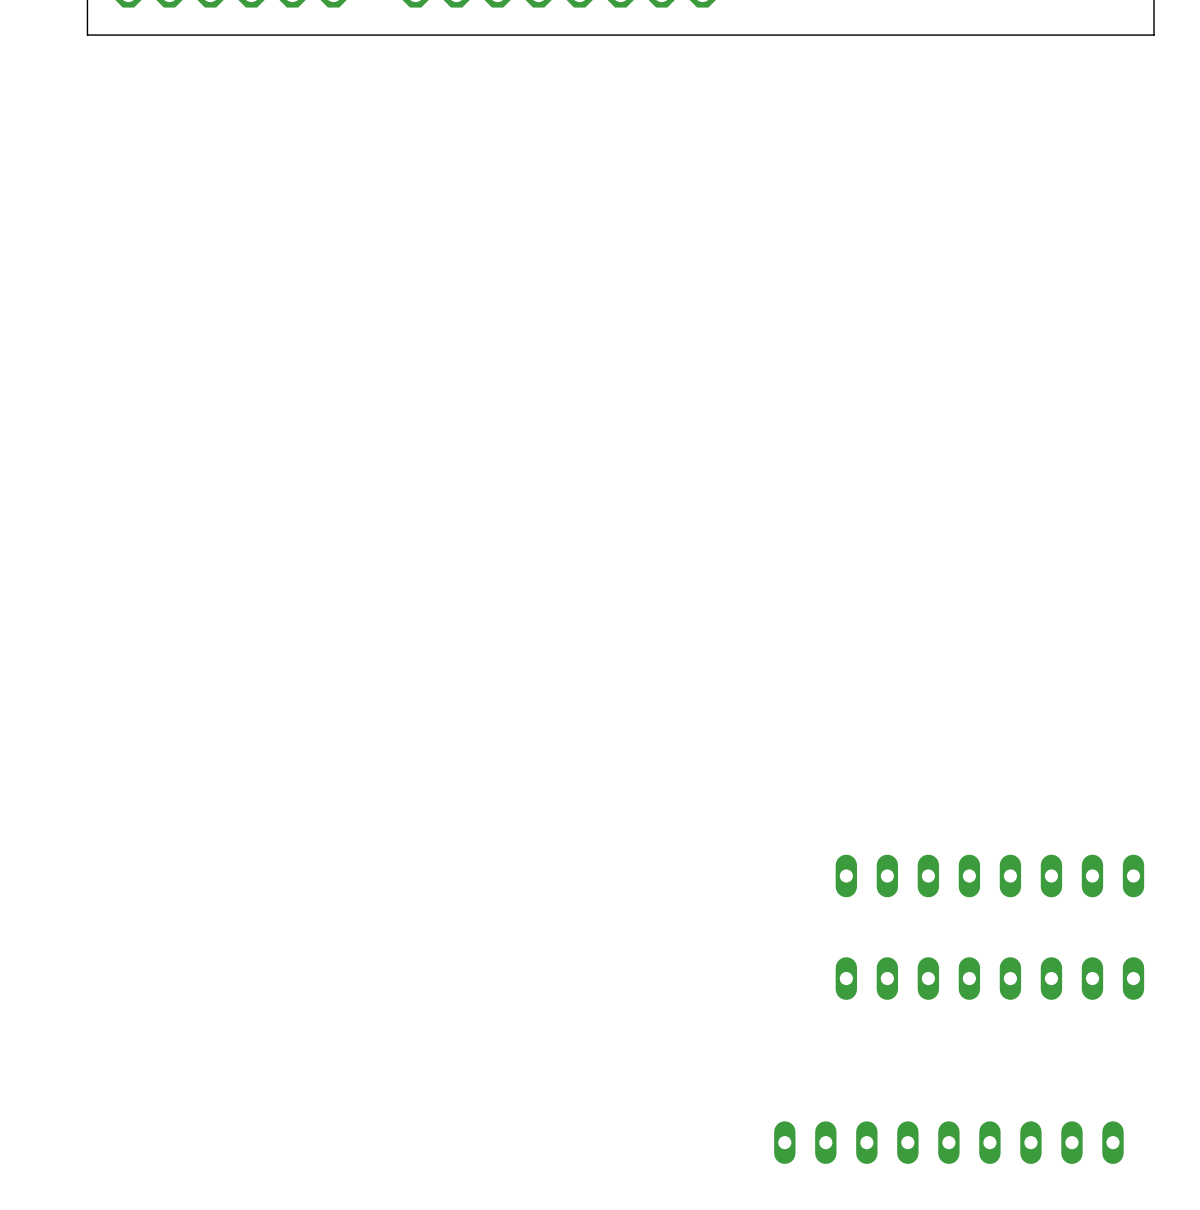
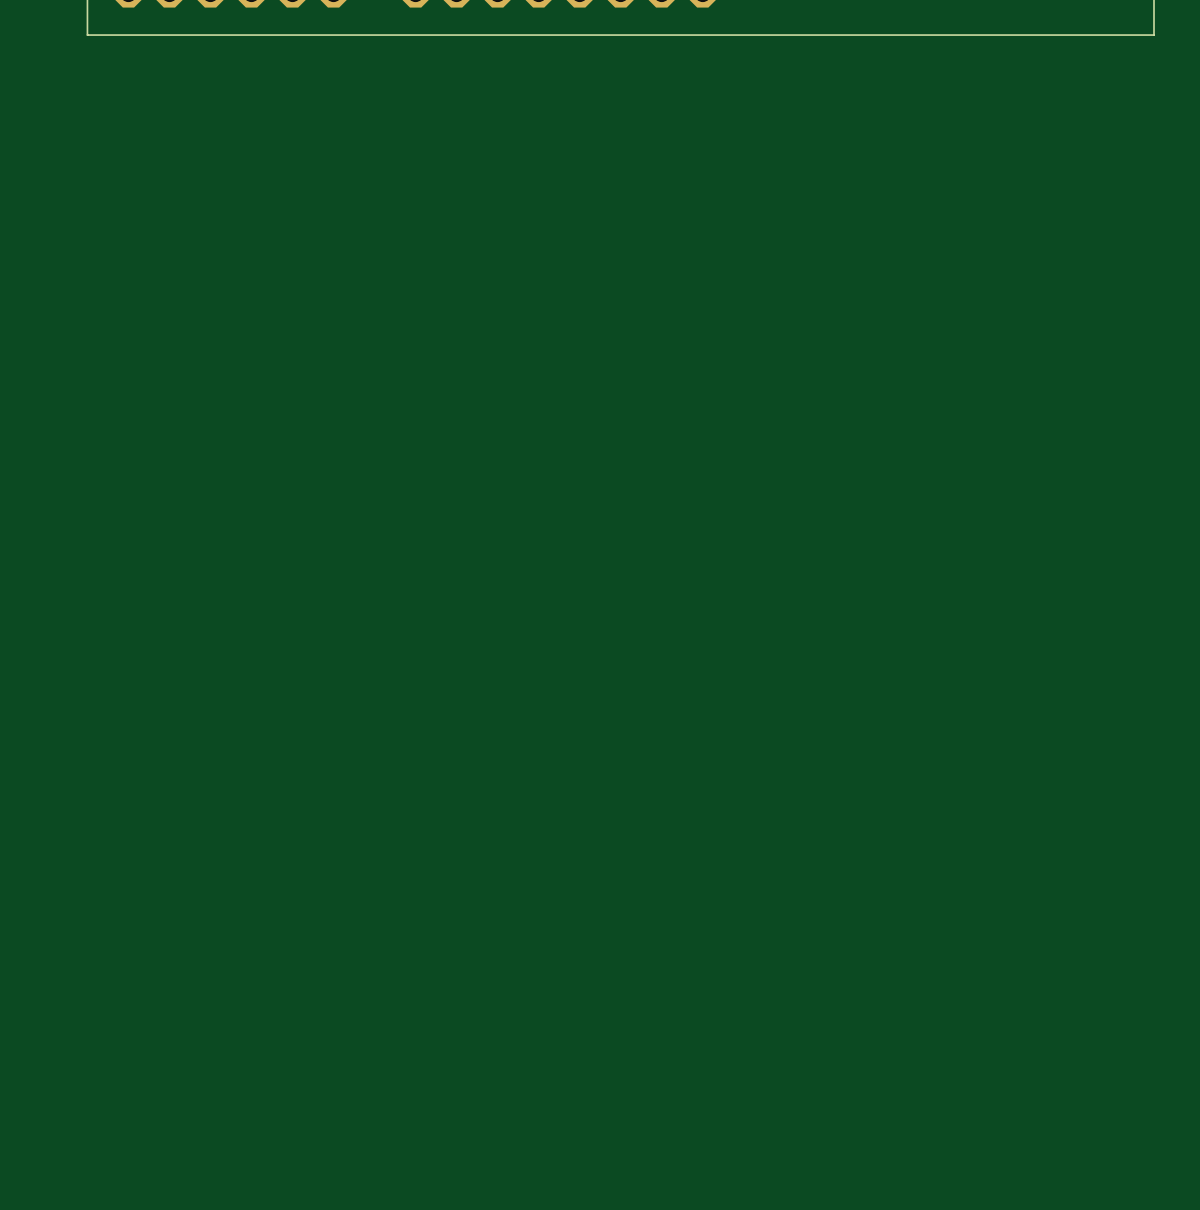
part: (989, 875) -> none
part: (989, 978) -> none
part: (948, 1142) -> none

